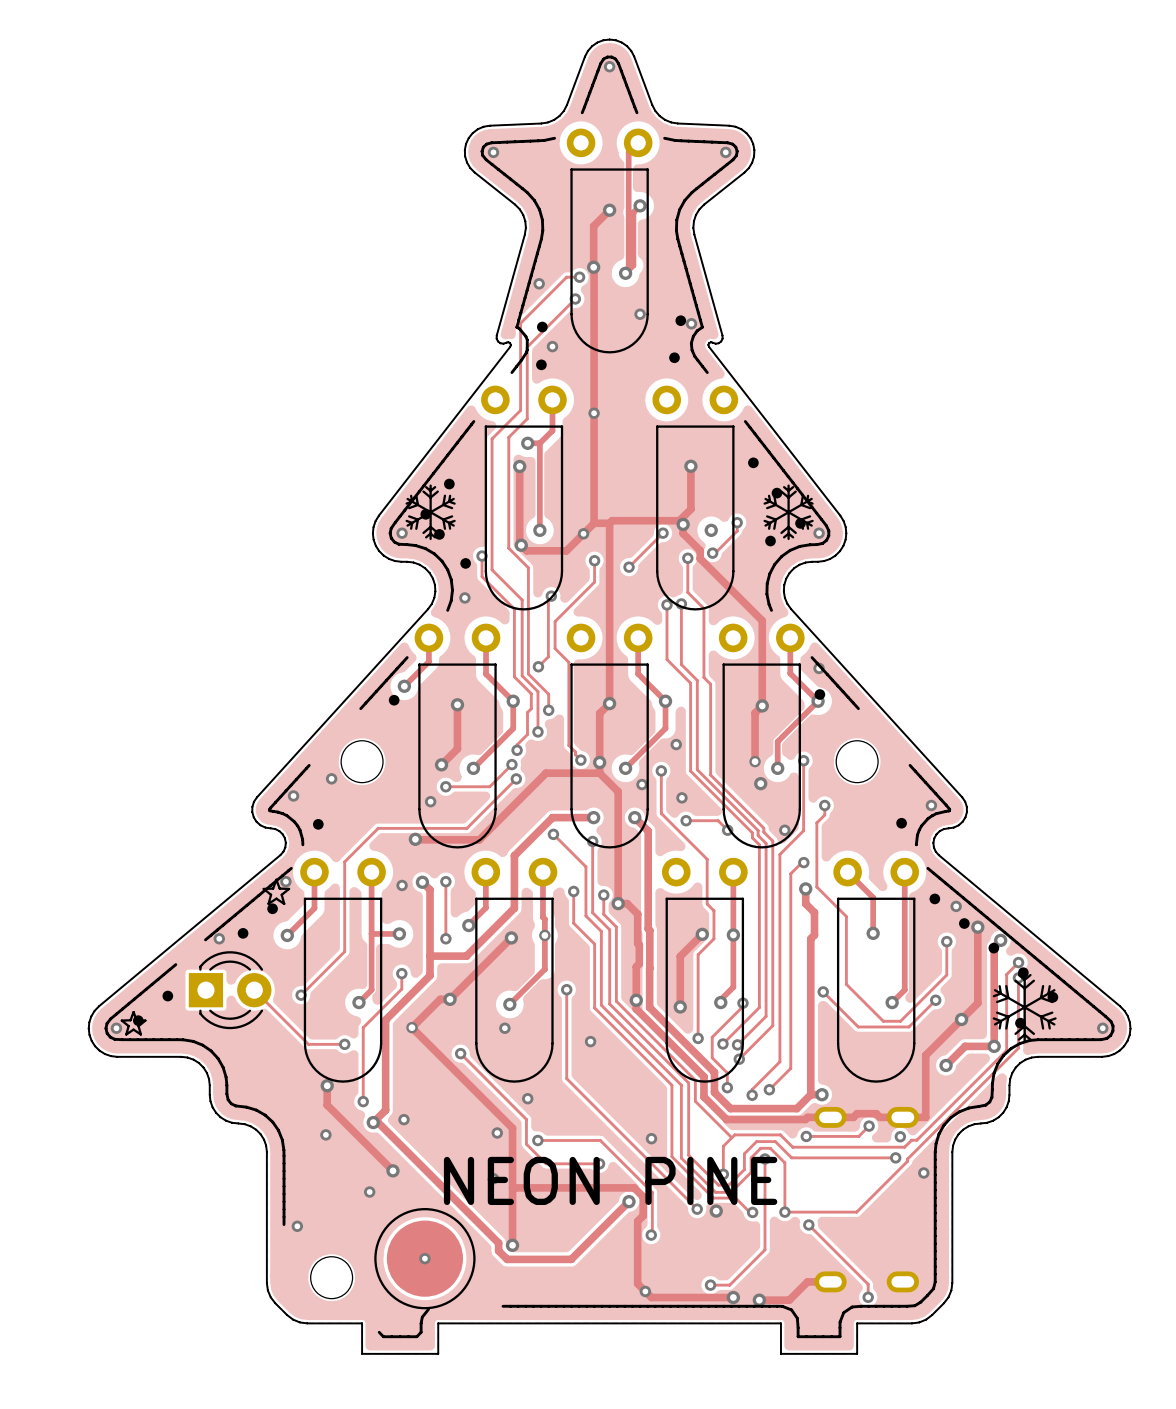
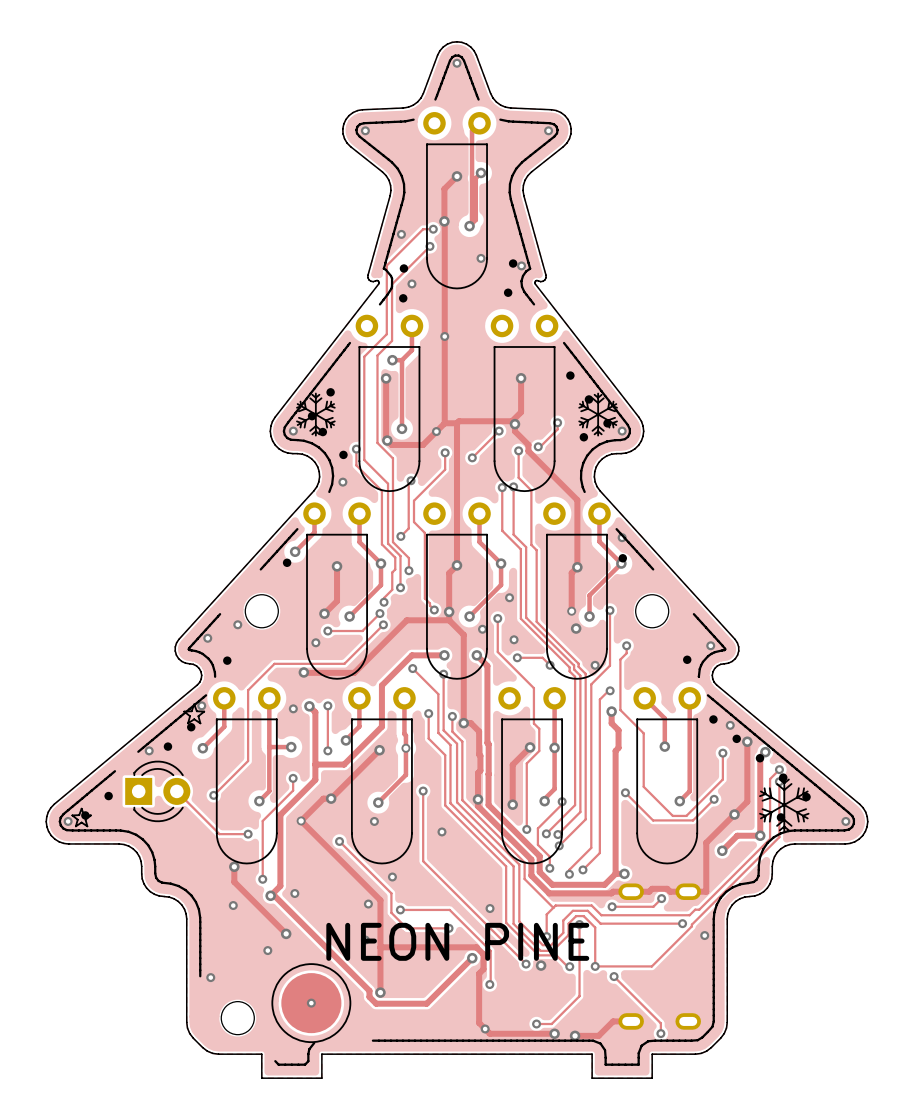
via: (711, 530) -> none
via: (900, 1136) -> none

